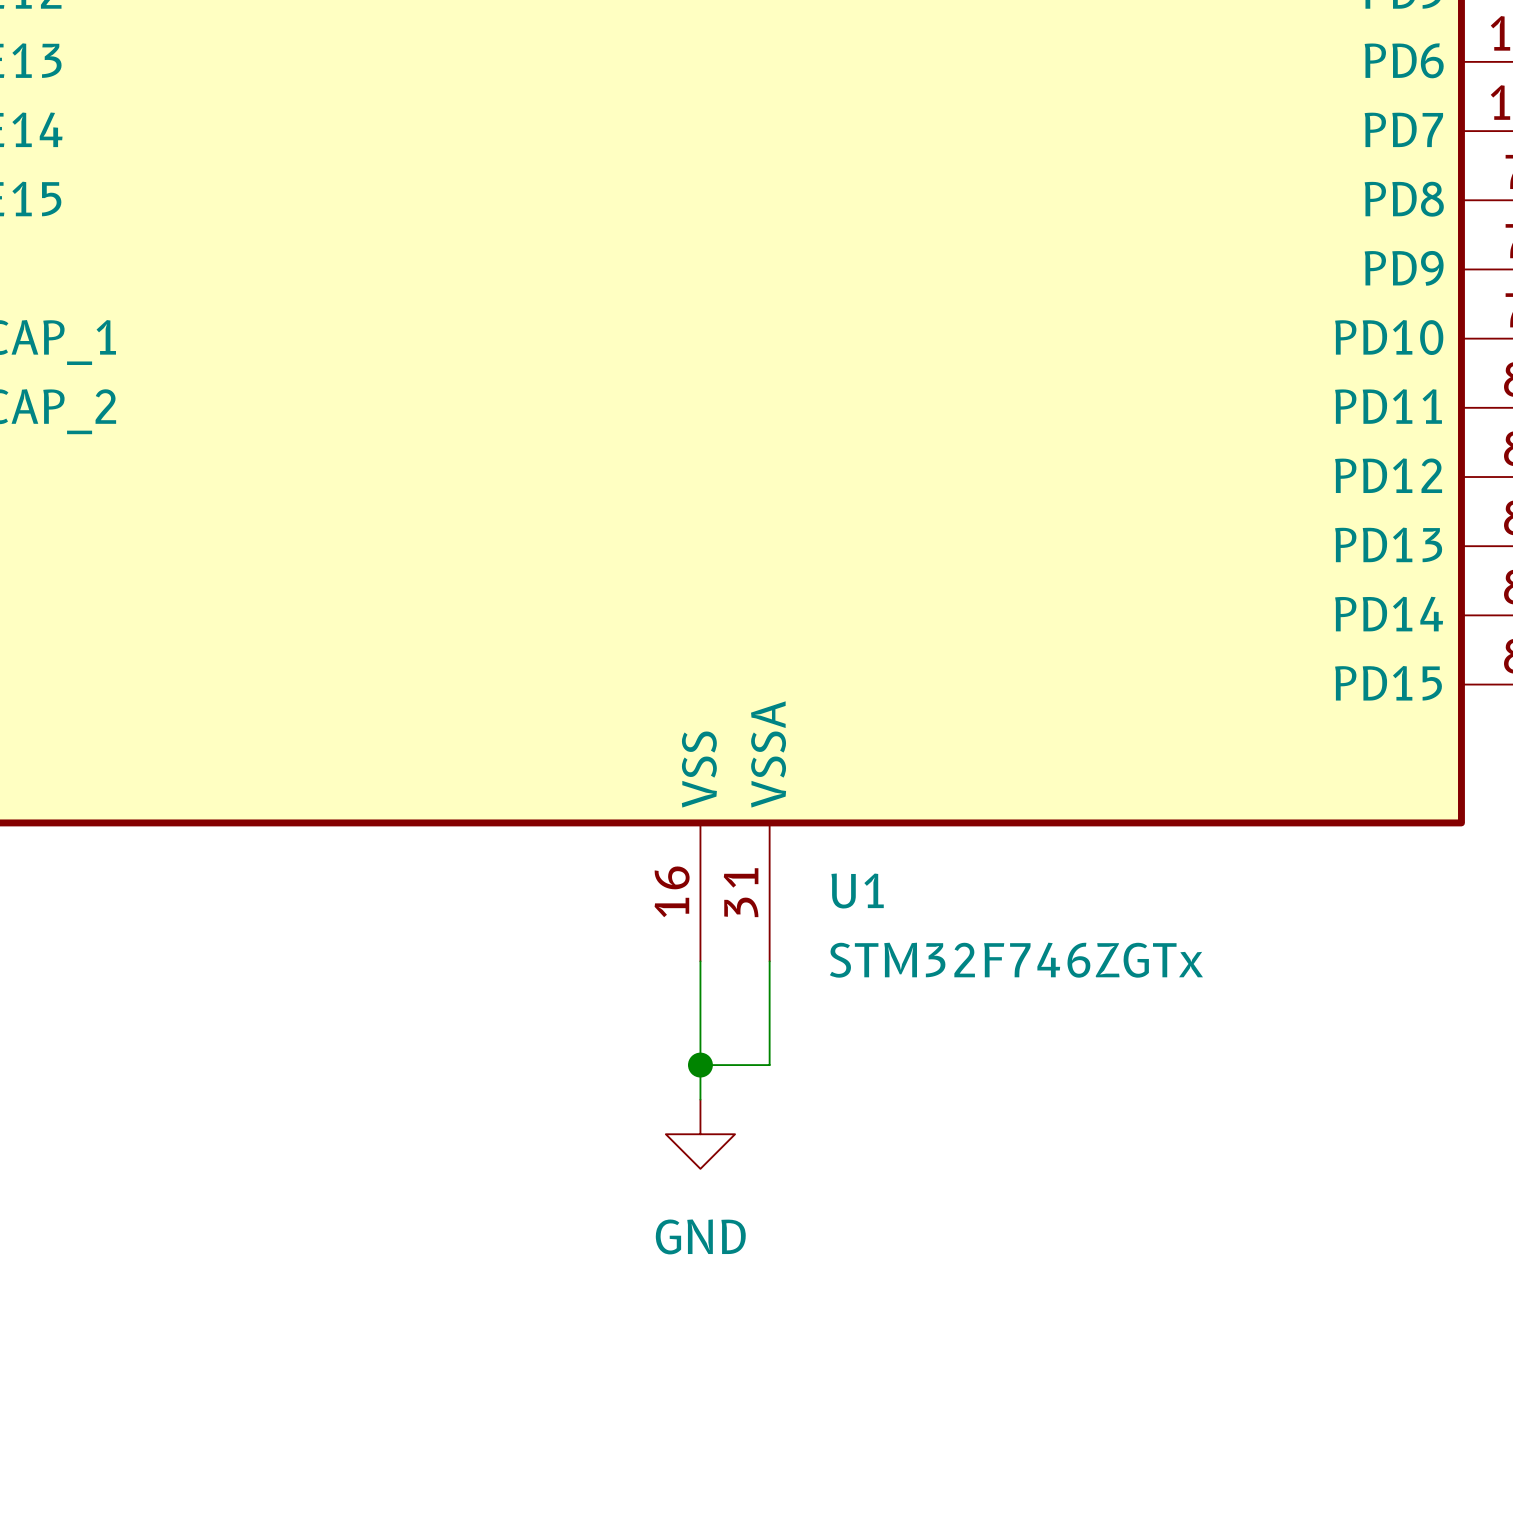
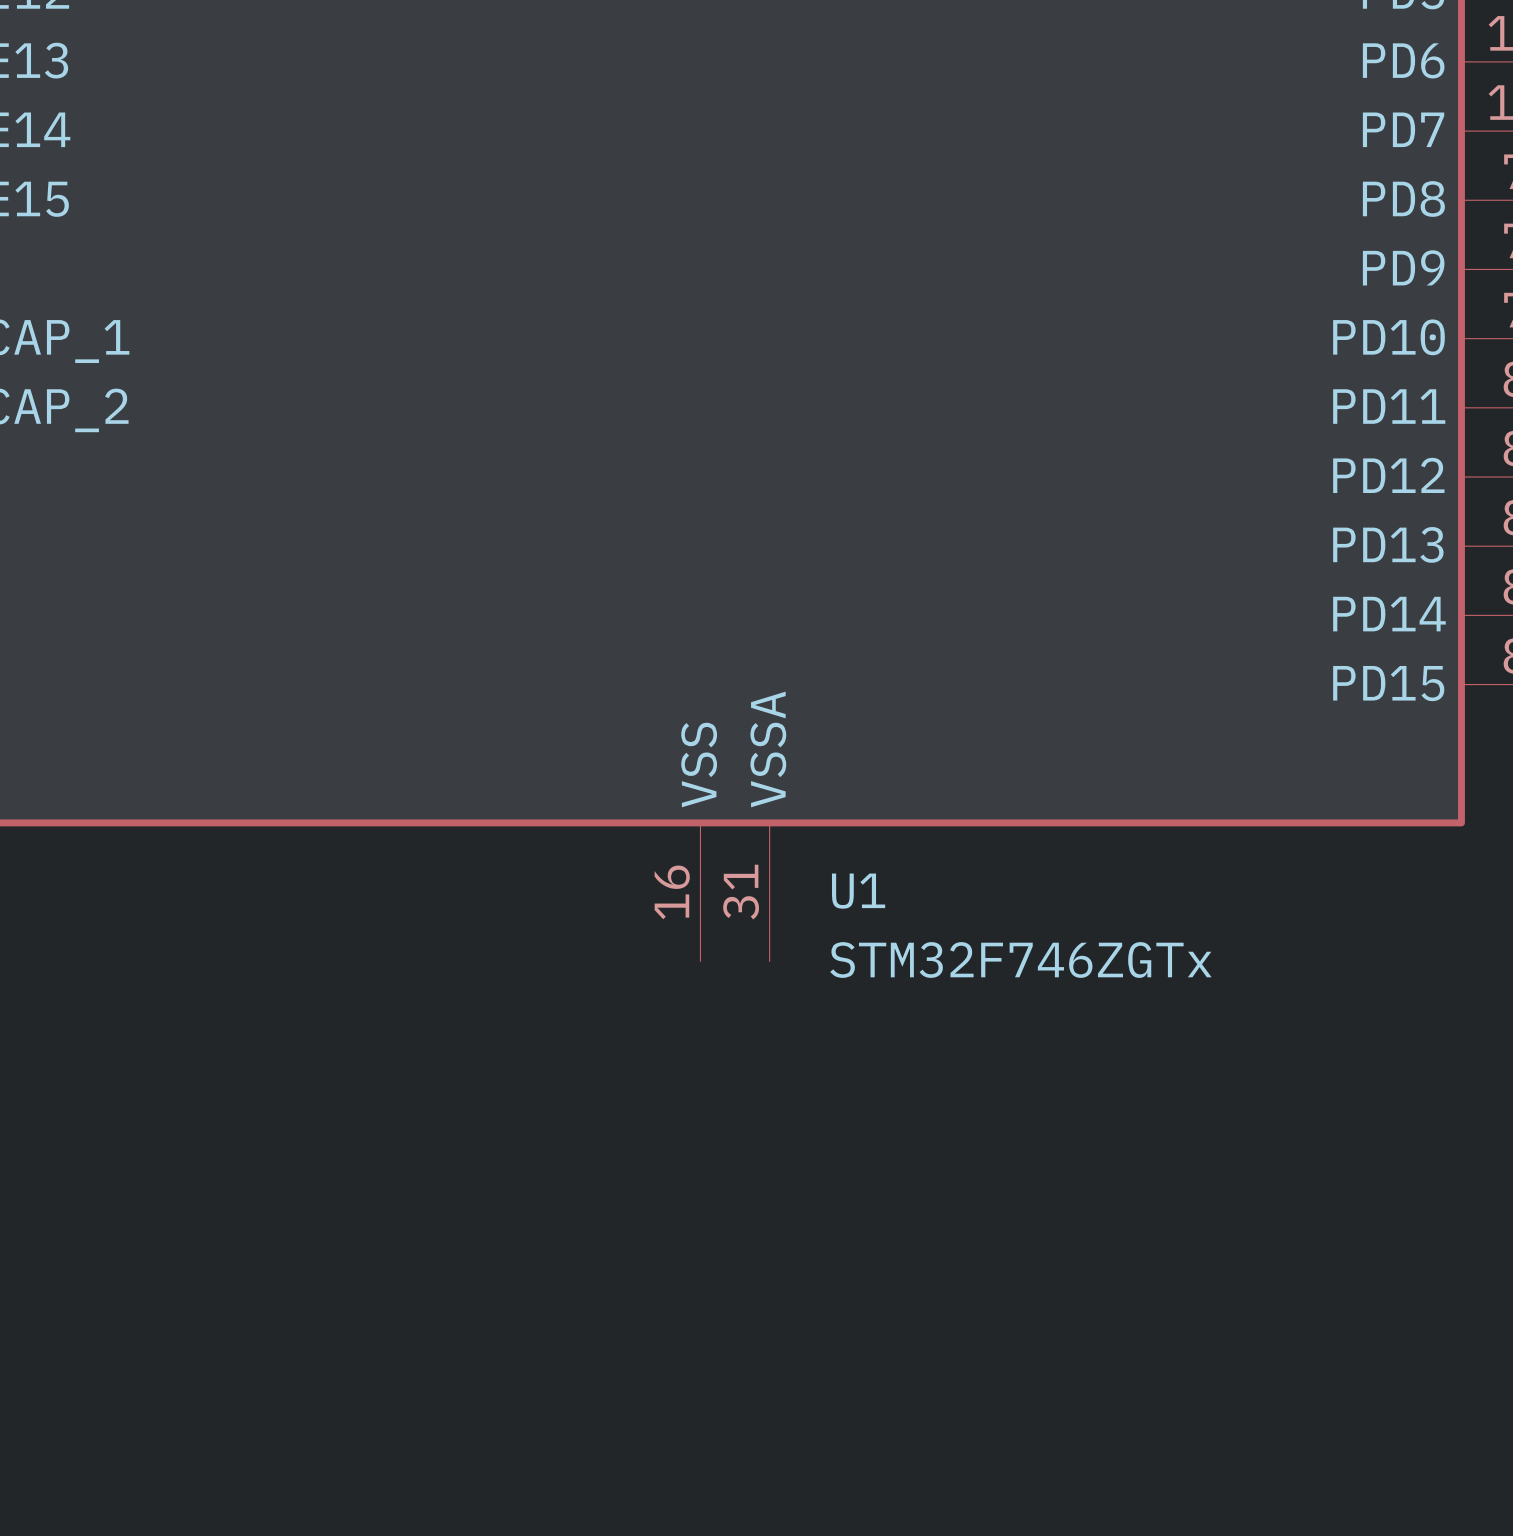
wire: (700, 961) (700, 1099) -> none
wire: (769, 961) (769, 1065) (700, 1065) -> none
junction: (700, 1065) -> none
power symbol: GND (700, 1134) -> none

